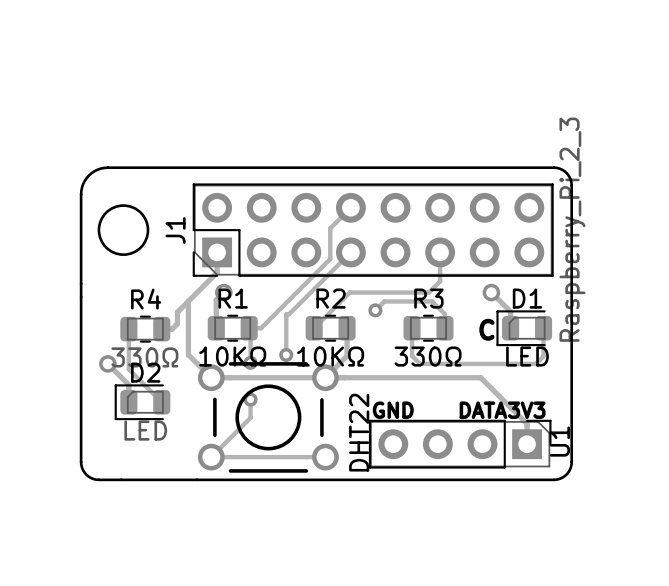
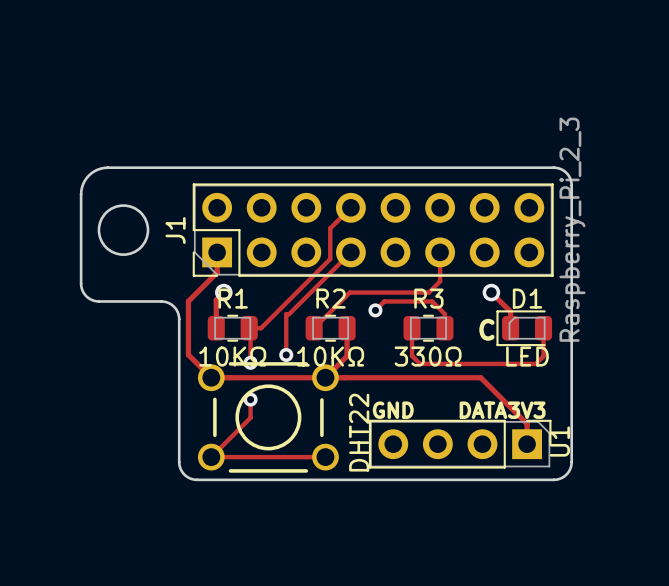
board edge: (81, 283) (81, 462) (83, 470) (90, 477) (96, 479) (197, 479) -> (81, 283) (84, 294) (94, 300) (163, 301) (170, 303) (176, 310) (179, 319) (179, 464) (186, 476) (197, 479)
track: (188, 301) (177, 312) (177, 323) (172, 329) (161, 329) -> none
track: (128, 329) (128, 369) (161, 402) -> none
R4: 330Ω (145, 329) -> none
track: (107, 363) (128, 384) (128, 402) -> none
via: (107, 363) -> none
D2: LED (142, 402) -> none

